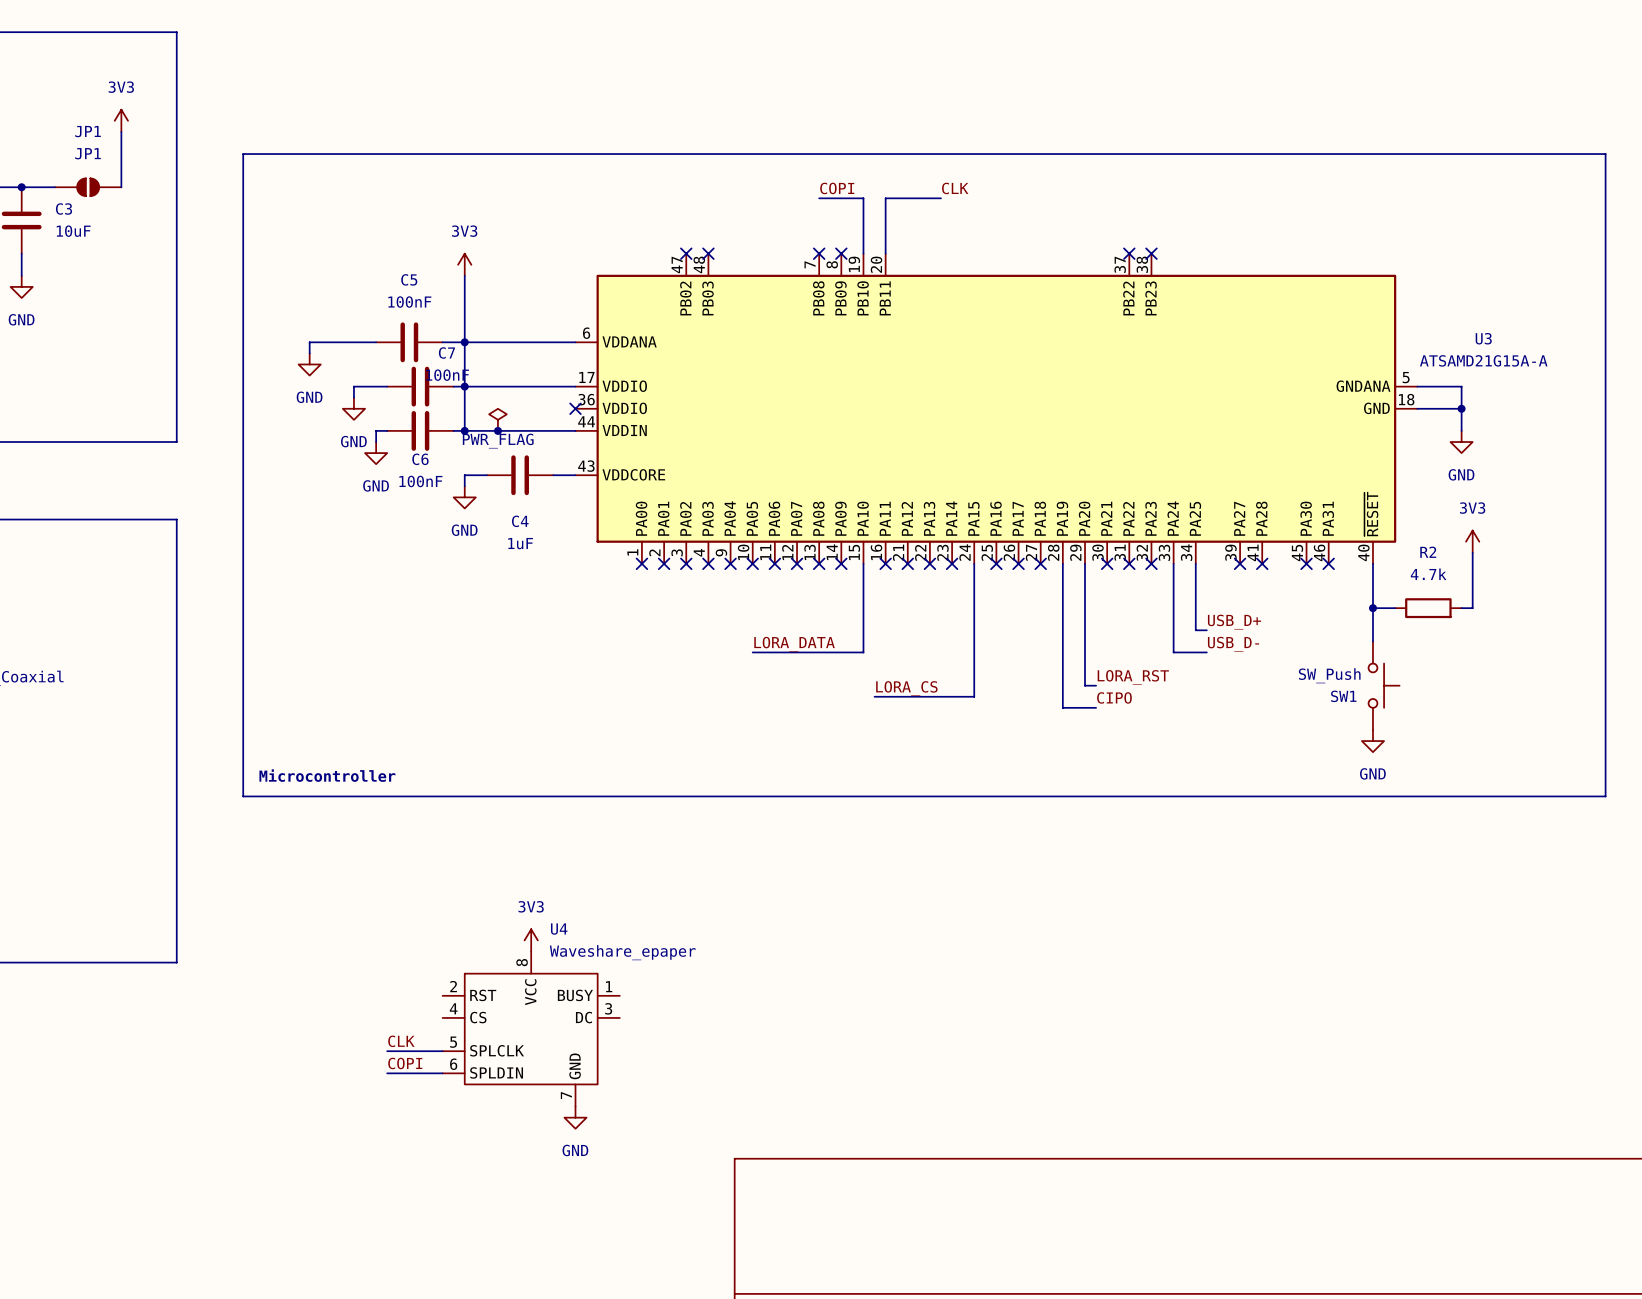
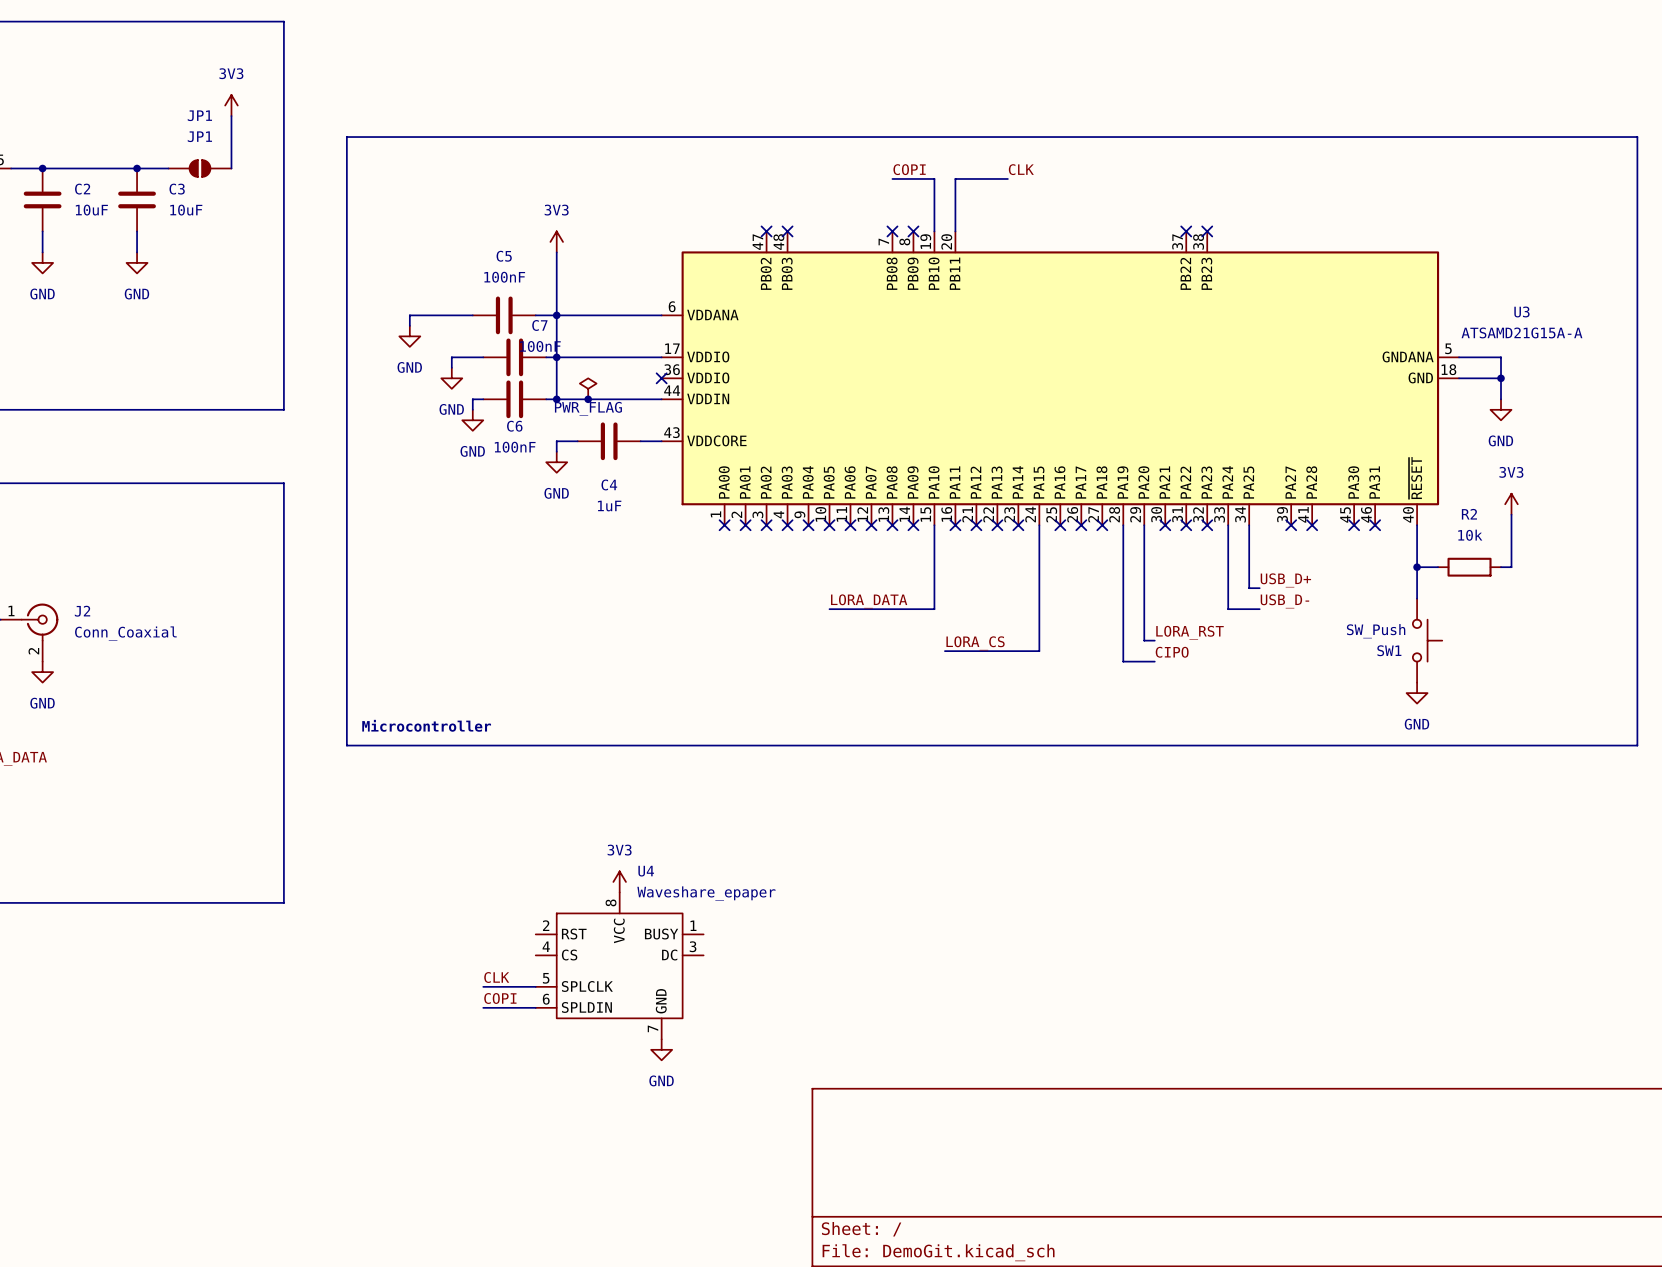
R2 value: 4.7k (1428, 574) -> 10k (1470, 535)

